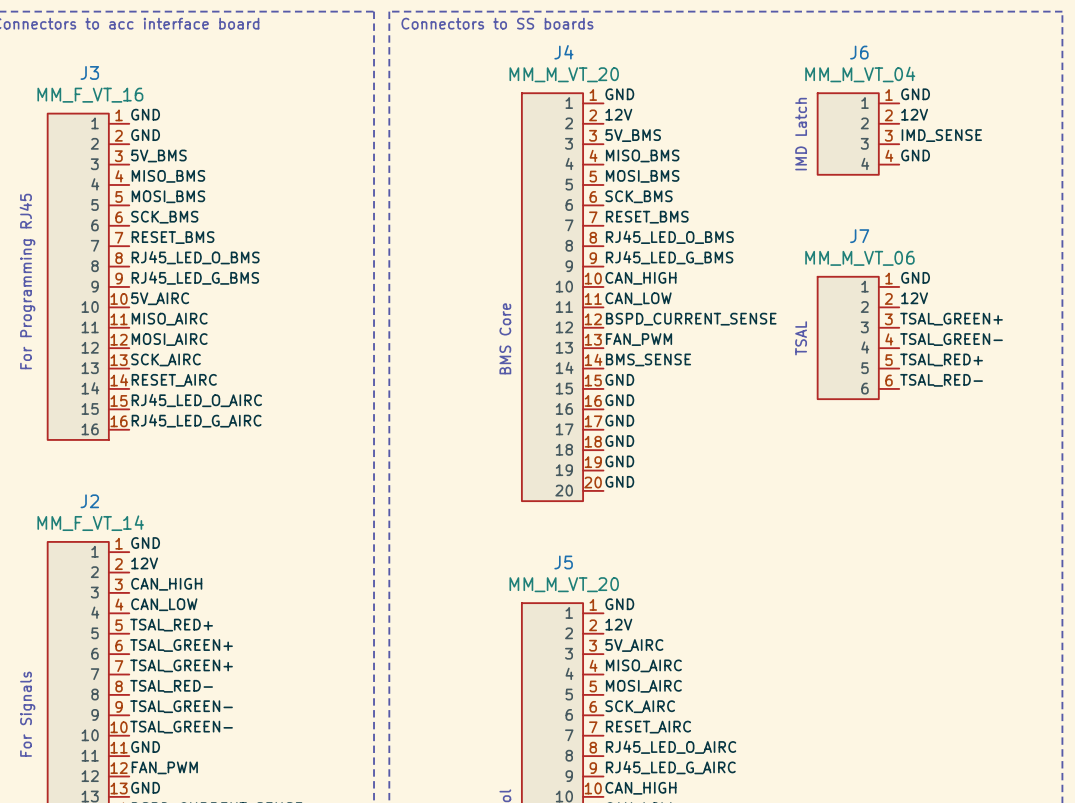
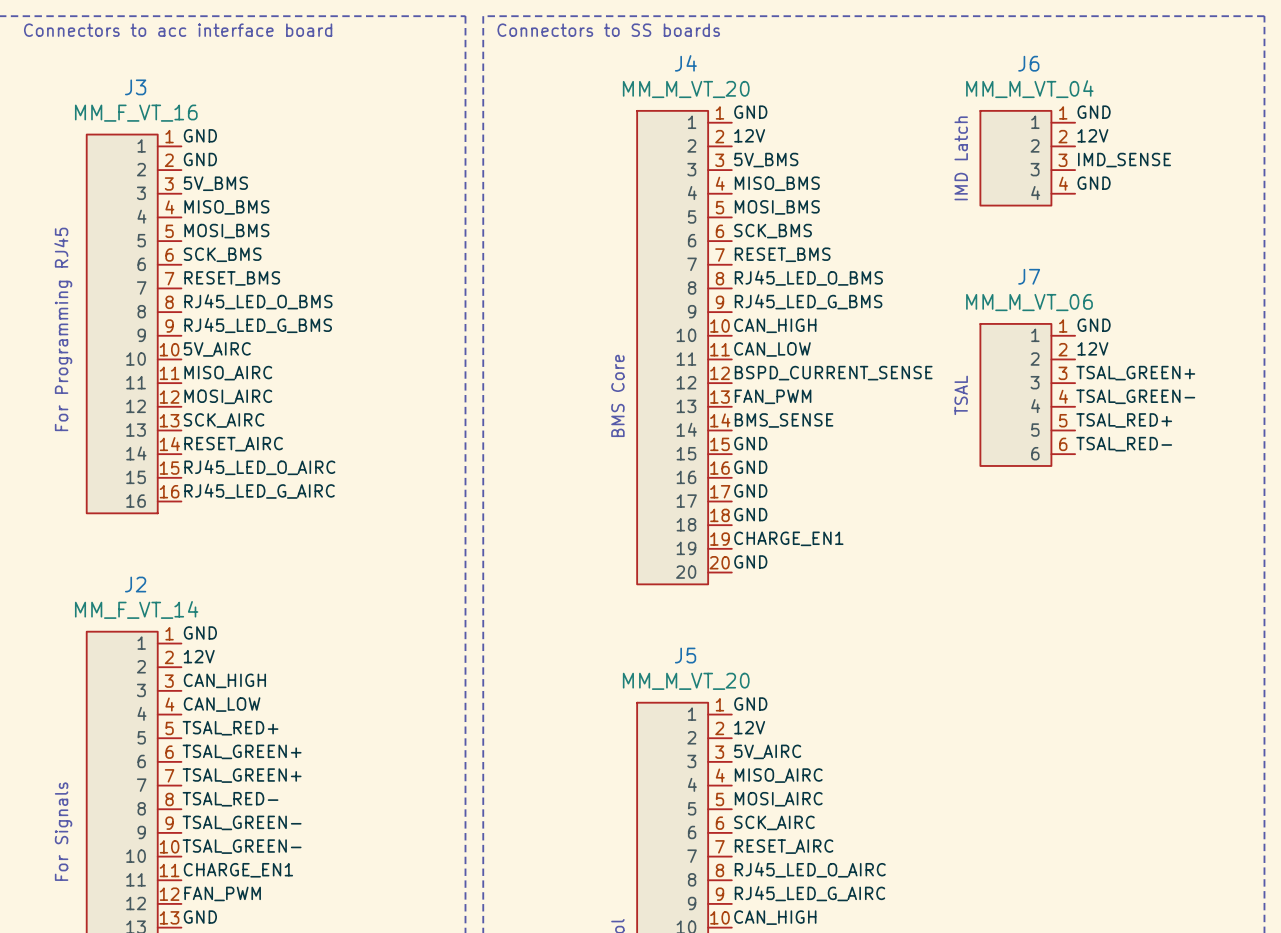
label: GND (619, 461) -> CHARGE_EN1 (788, 538)
label: GND (145, 747) -> CHARGE_EN1 (238, 870)

